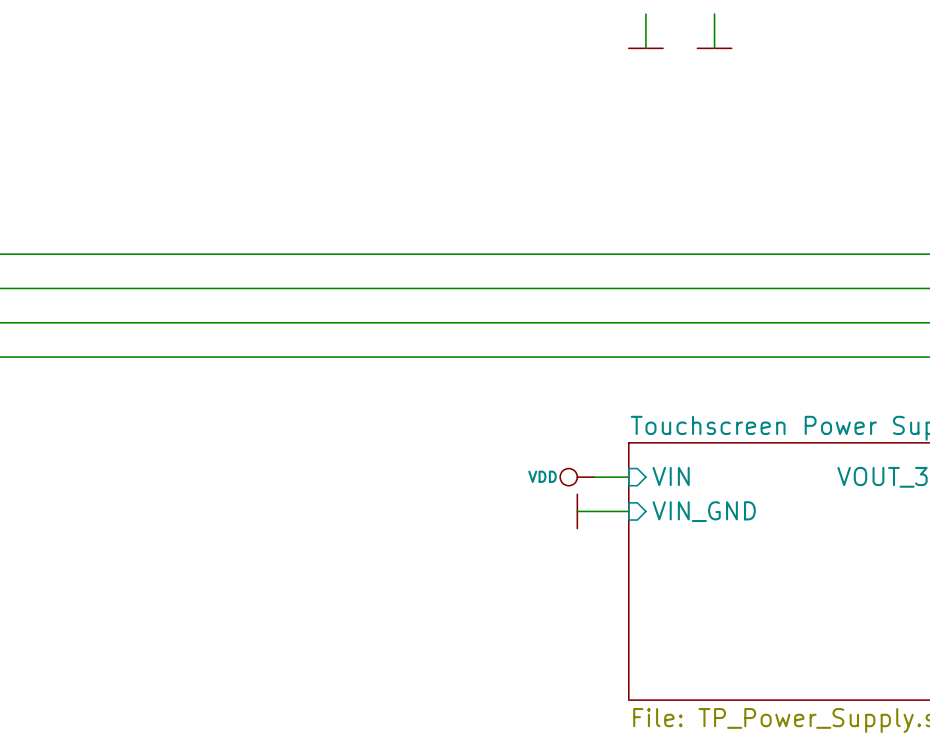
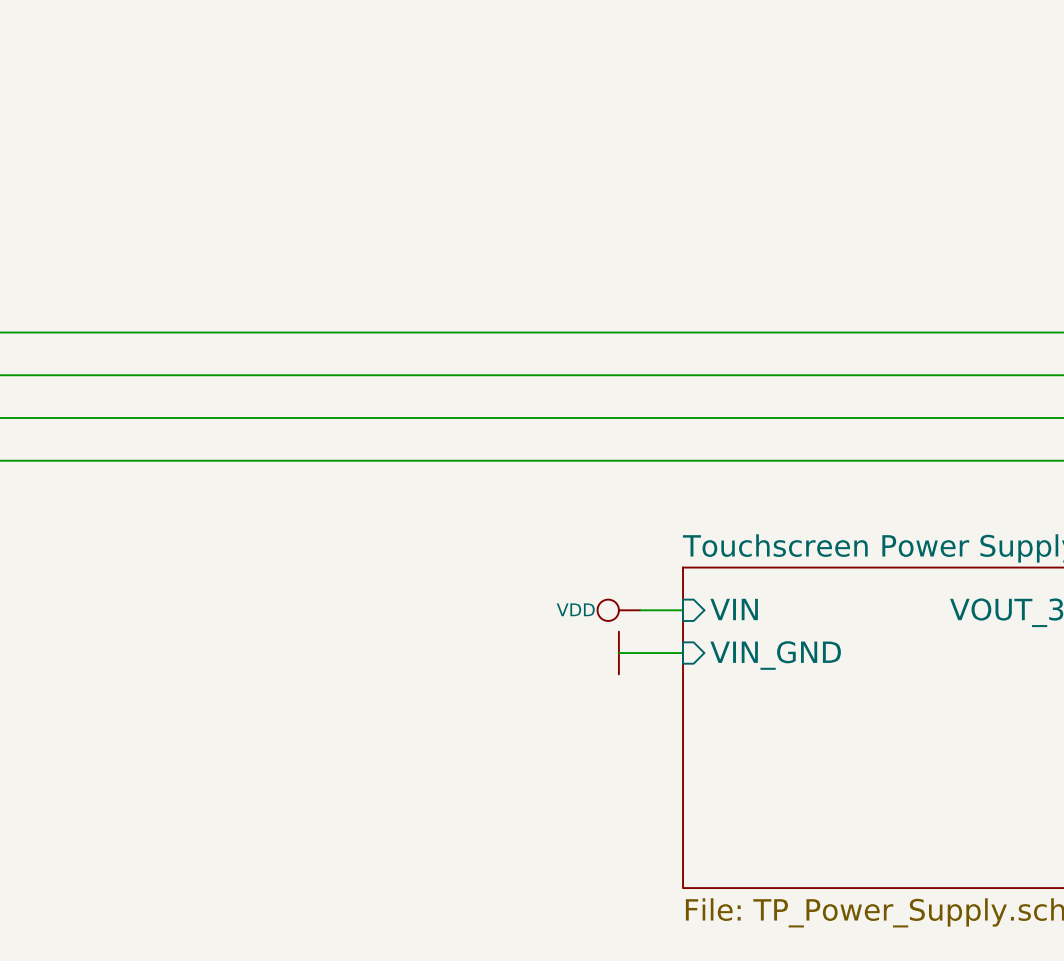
wire: (645, 14) (645, 48) -> none
wire: (714, 14) (714, 48) -> none
power symbol: (645, 48) -> none
power symbol: (714, 48) -> none

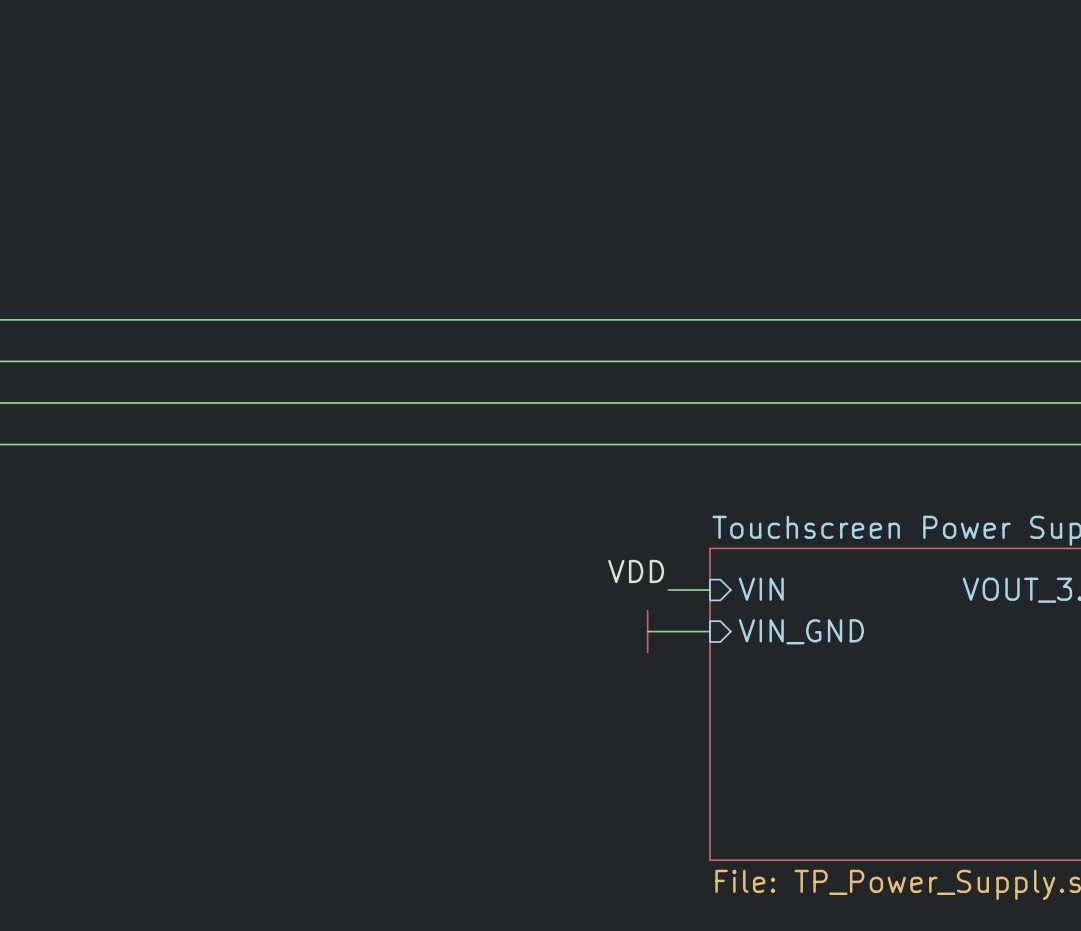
label: none -> VDD (636, 571)
power symbol: VDD (618, 610) -> none

